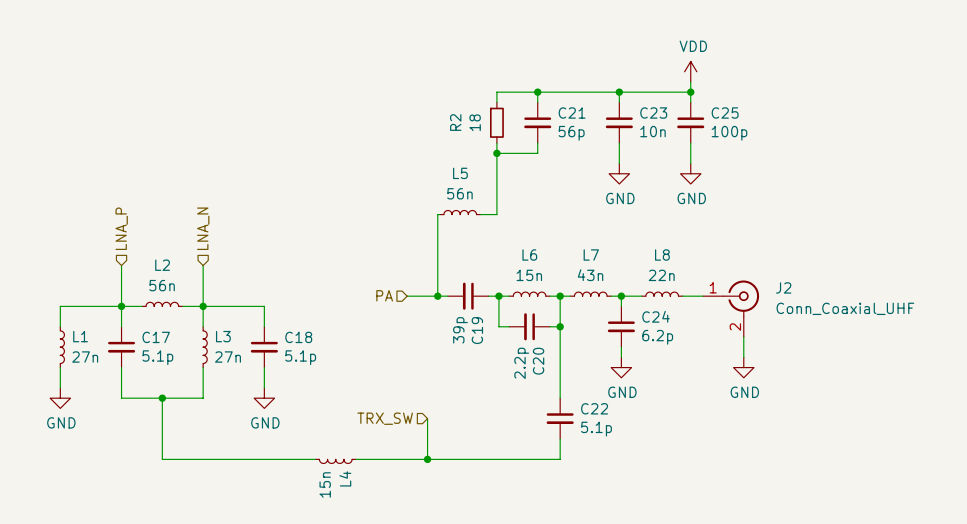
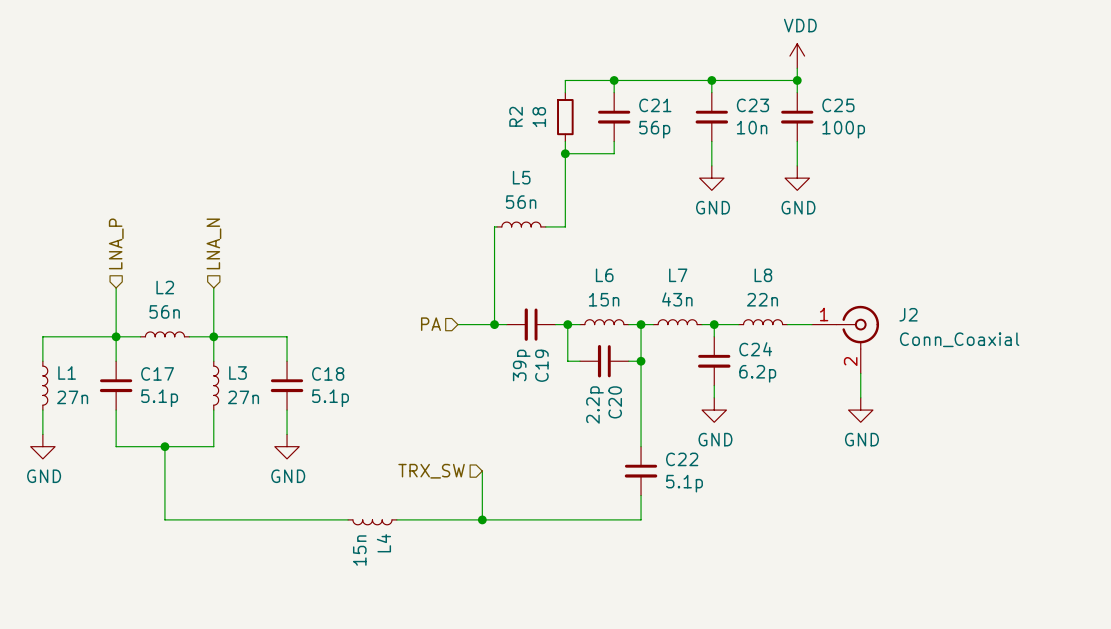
J2 value: Conn_Coaxial_UHF (845, 308) -> Conn_Coaxial (959, 339)

